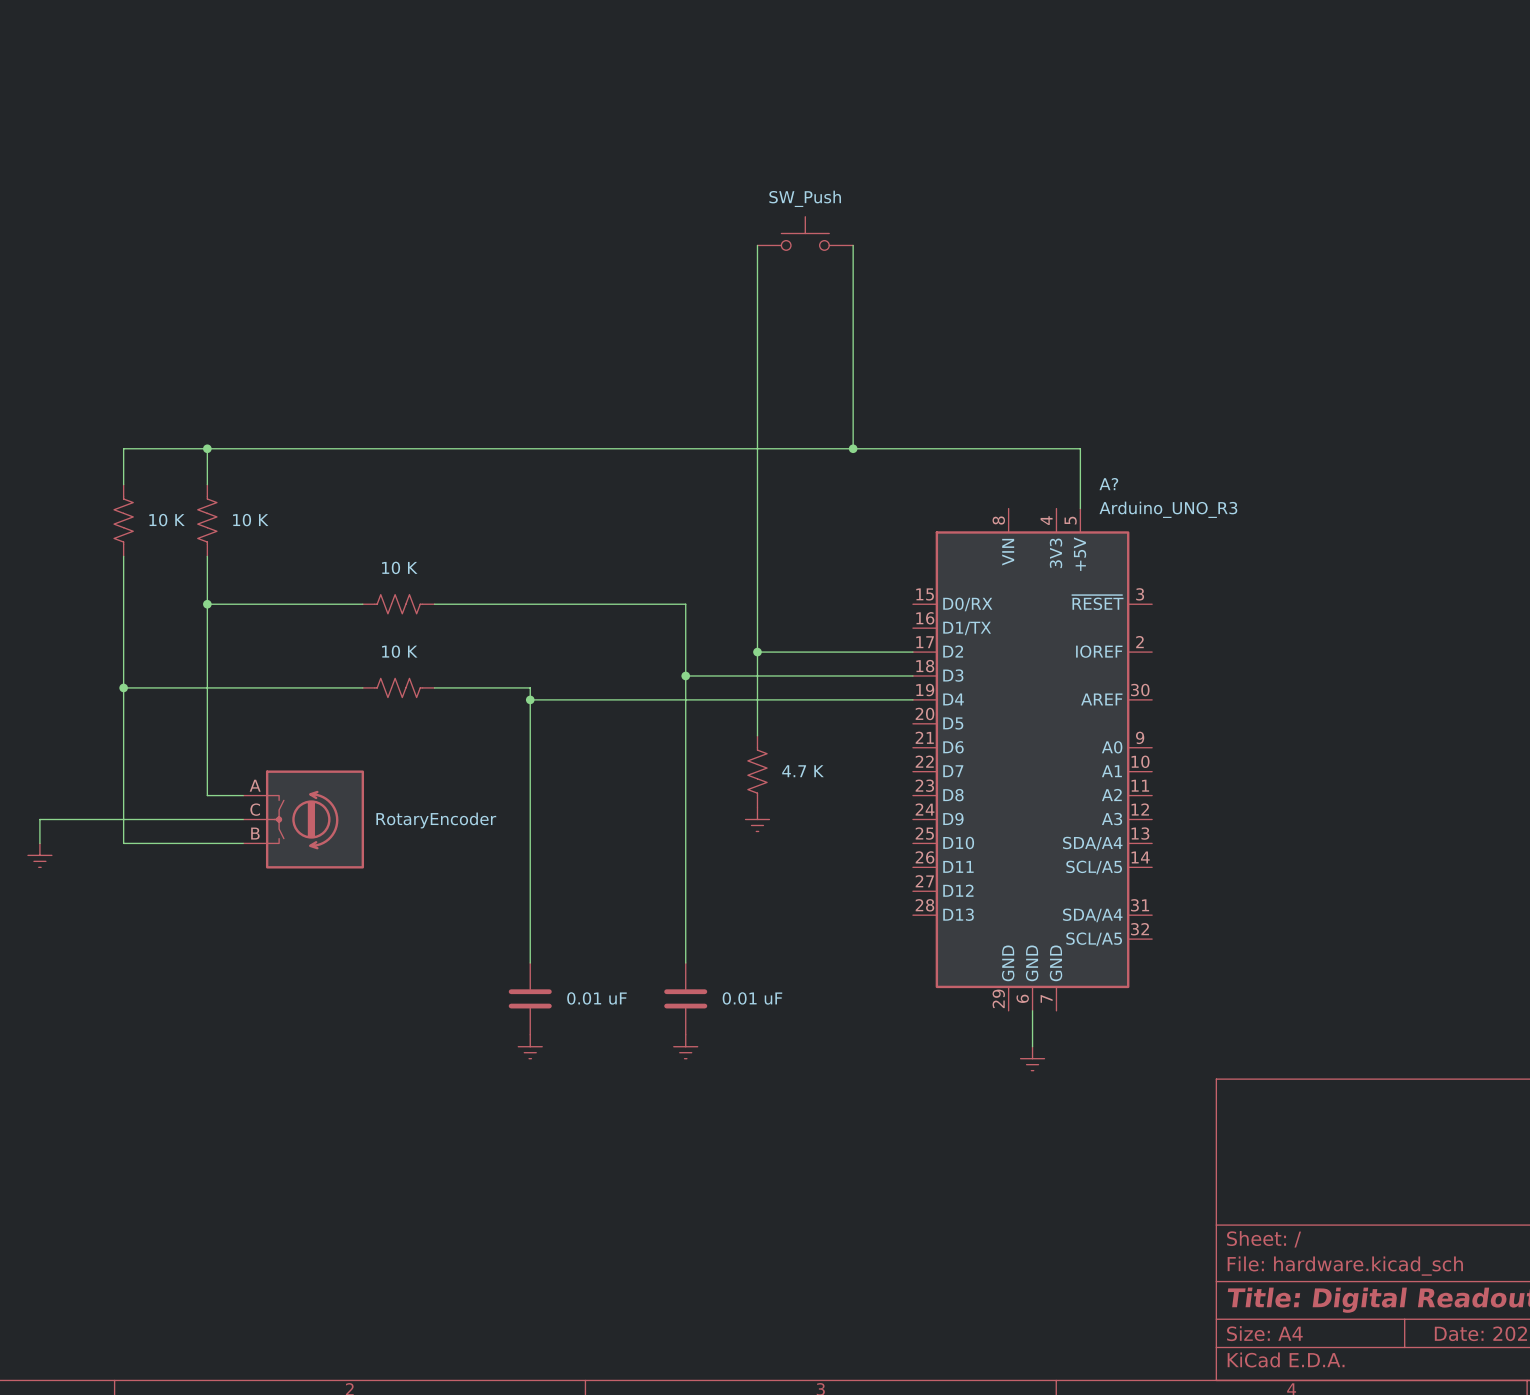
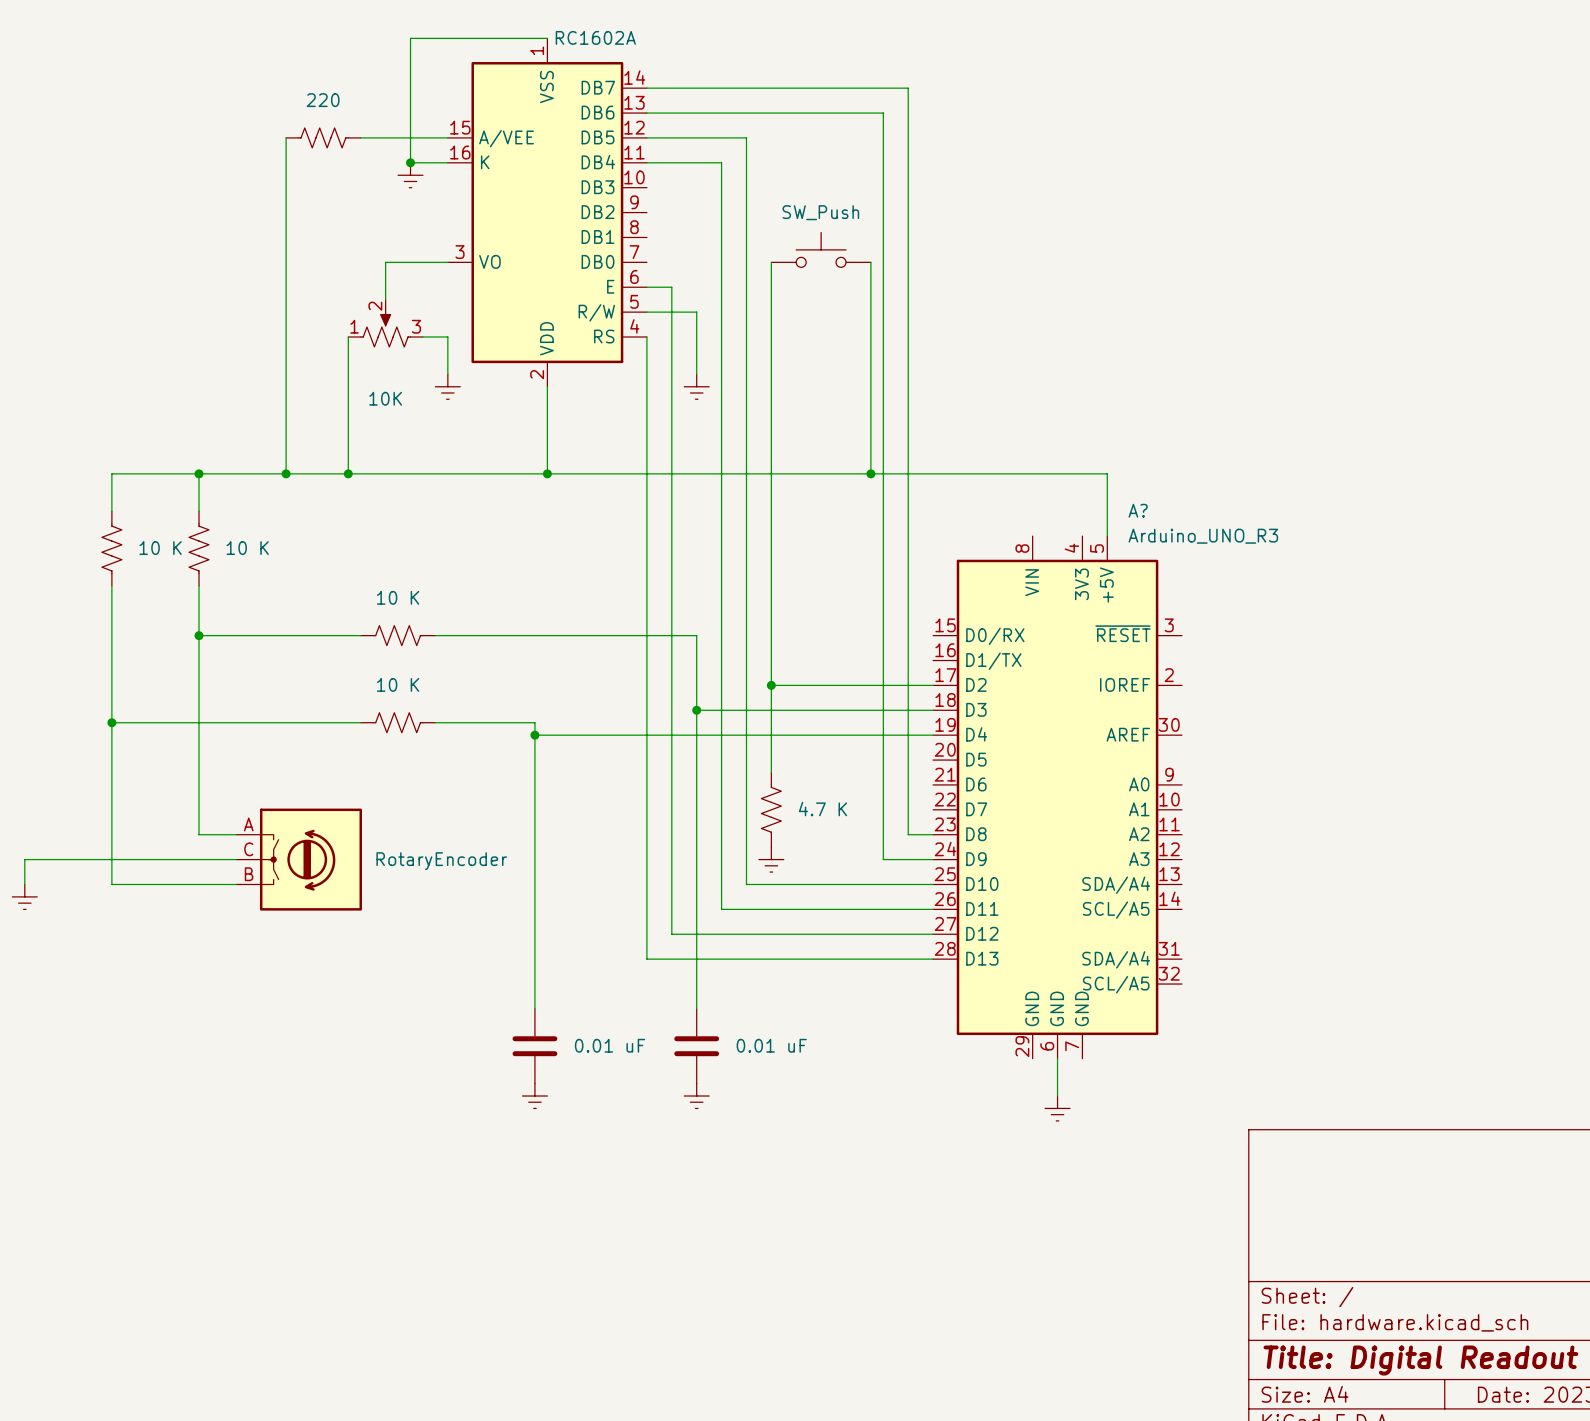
wire: none -> (547, 38) (410, 38) (410, 162) (447, 162)
wire: none -> (646, 88) (908, 88) (908, 834) (933, 834)
wire: none -> (646, 113) (883, 113) (883, 859) (933, 859)
wire: none -> (286, 137) (286, 473)
part: none -> 220 (323, 137)
wire: none -> (360, 137) (447, 137)
wire: none -> (646, 137) (746, 137) (746, 884) (933, 884)
junction: none -> (410, 162)
wire: none -> (646, 162) (721, 162) (721, 909) (933, 909)
power symbol: none -> (410, 175)
part: none -> RC1602A (547, 212)
wire: none -> (447, 262) (385, 262) (385, 299)
wire: none -> (646, 287) (671, 287) (671, 934) (933, 934)
wire: none -> (646, 312) (696, 312) (696, 374)
part: none -> 10K (385, 323)
wire: none -> (348, 337) (348, 473)
wire: none -> (422, 337) (447, 337) (447, 374)
wire: none -> (646, 337) (646, 959) (933, 959)
power symbol: none -> (447, 386)
wire: none -> (547, 386) (547, 473)
power symbol: none -> (696, 386)
junction: none -> (286, 473)
junction: none -> (348, 473)
junction: none -> (547, 473)

